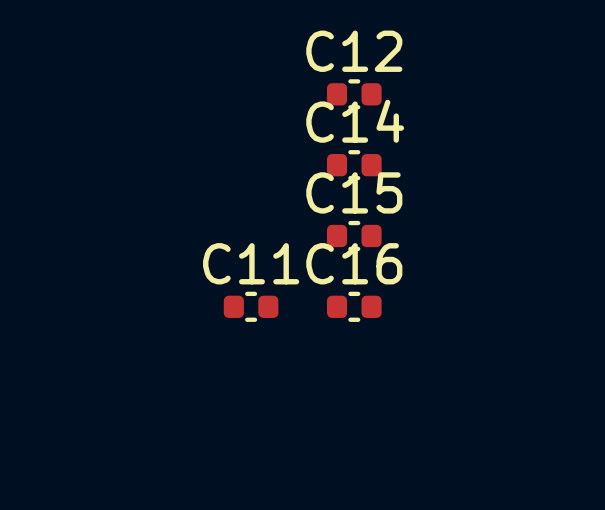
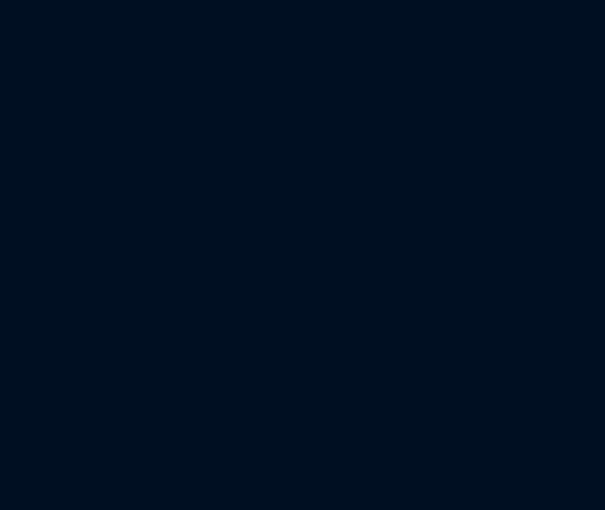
C12: (354, 94) -> none
C14: (354, 165) -> none
C15: (354, 235) -> none
C11: (251, 306) -> none
C16: (354, 306) -> none

